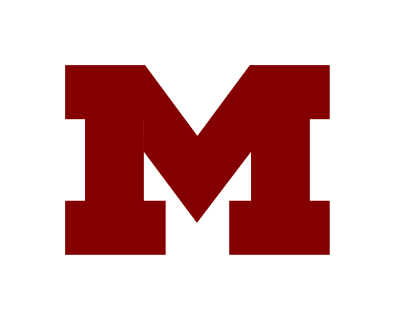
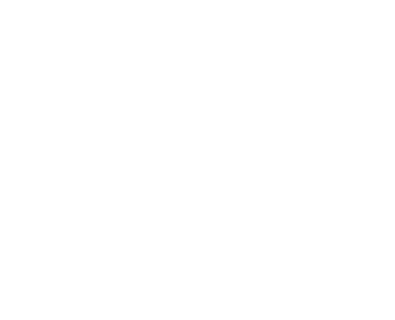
part: (197, 159) -> none

